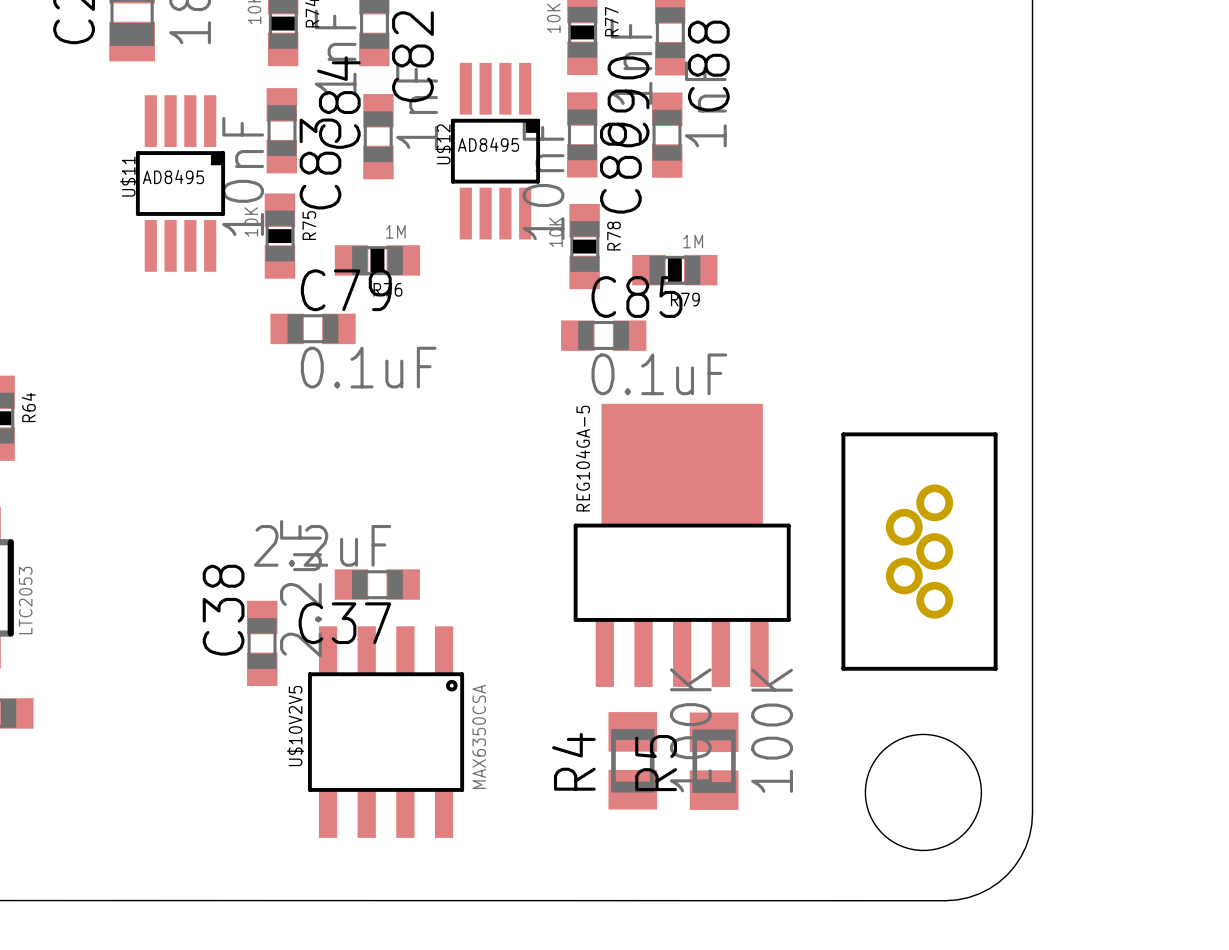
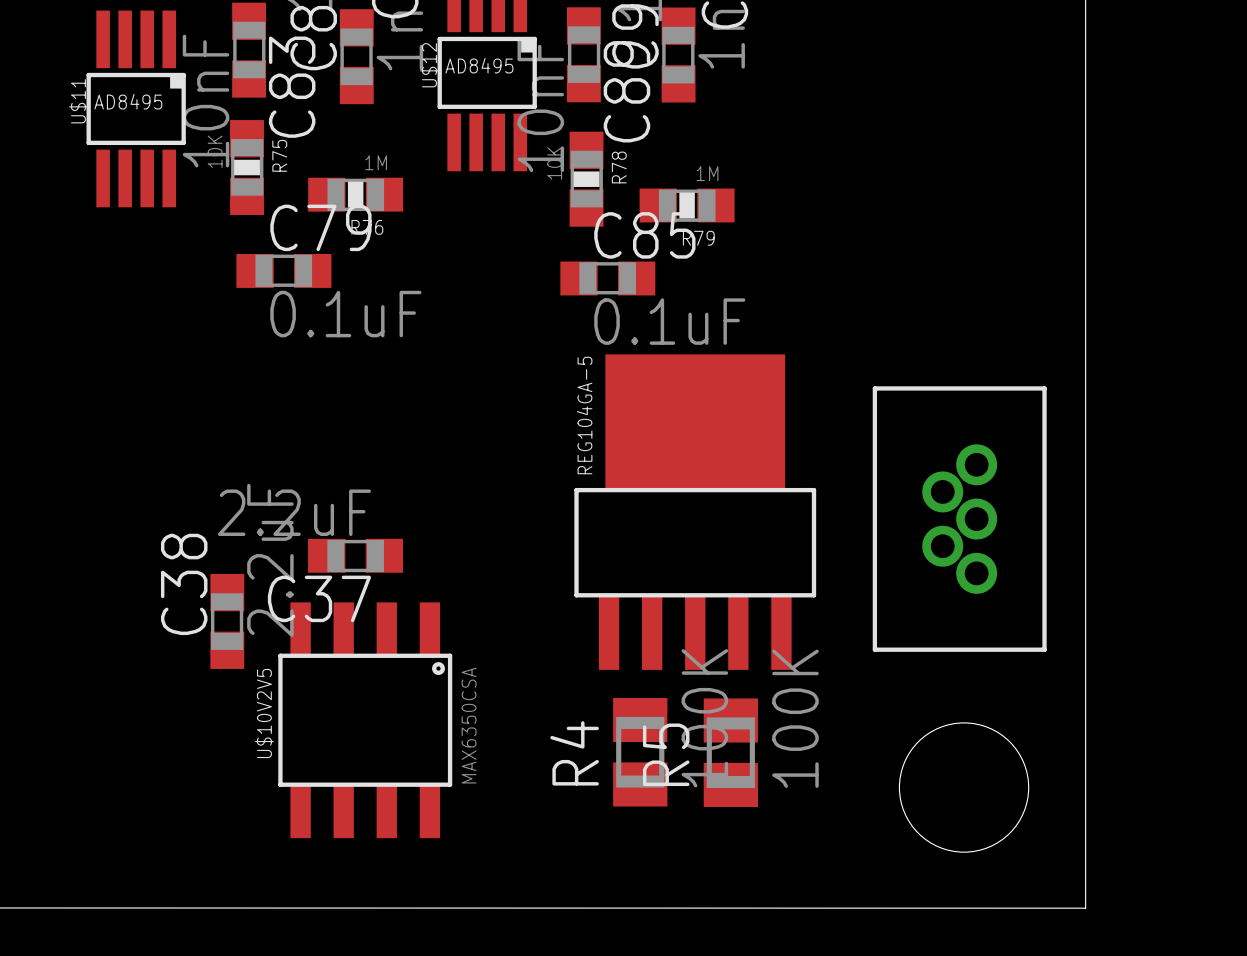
board edge: (1032, 813) (1025, 846) (1006, 875) (978, 894) (945, 900) -> (1085, 811) (1085, 908) (988, 908)

